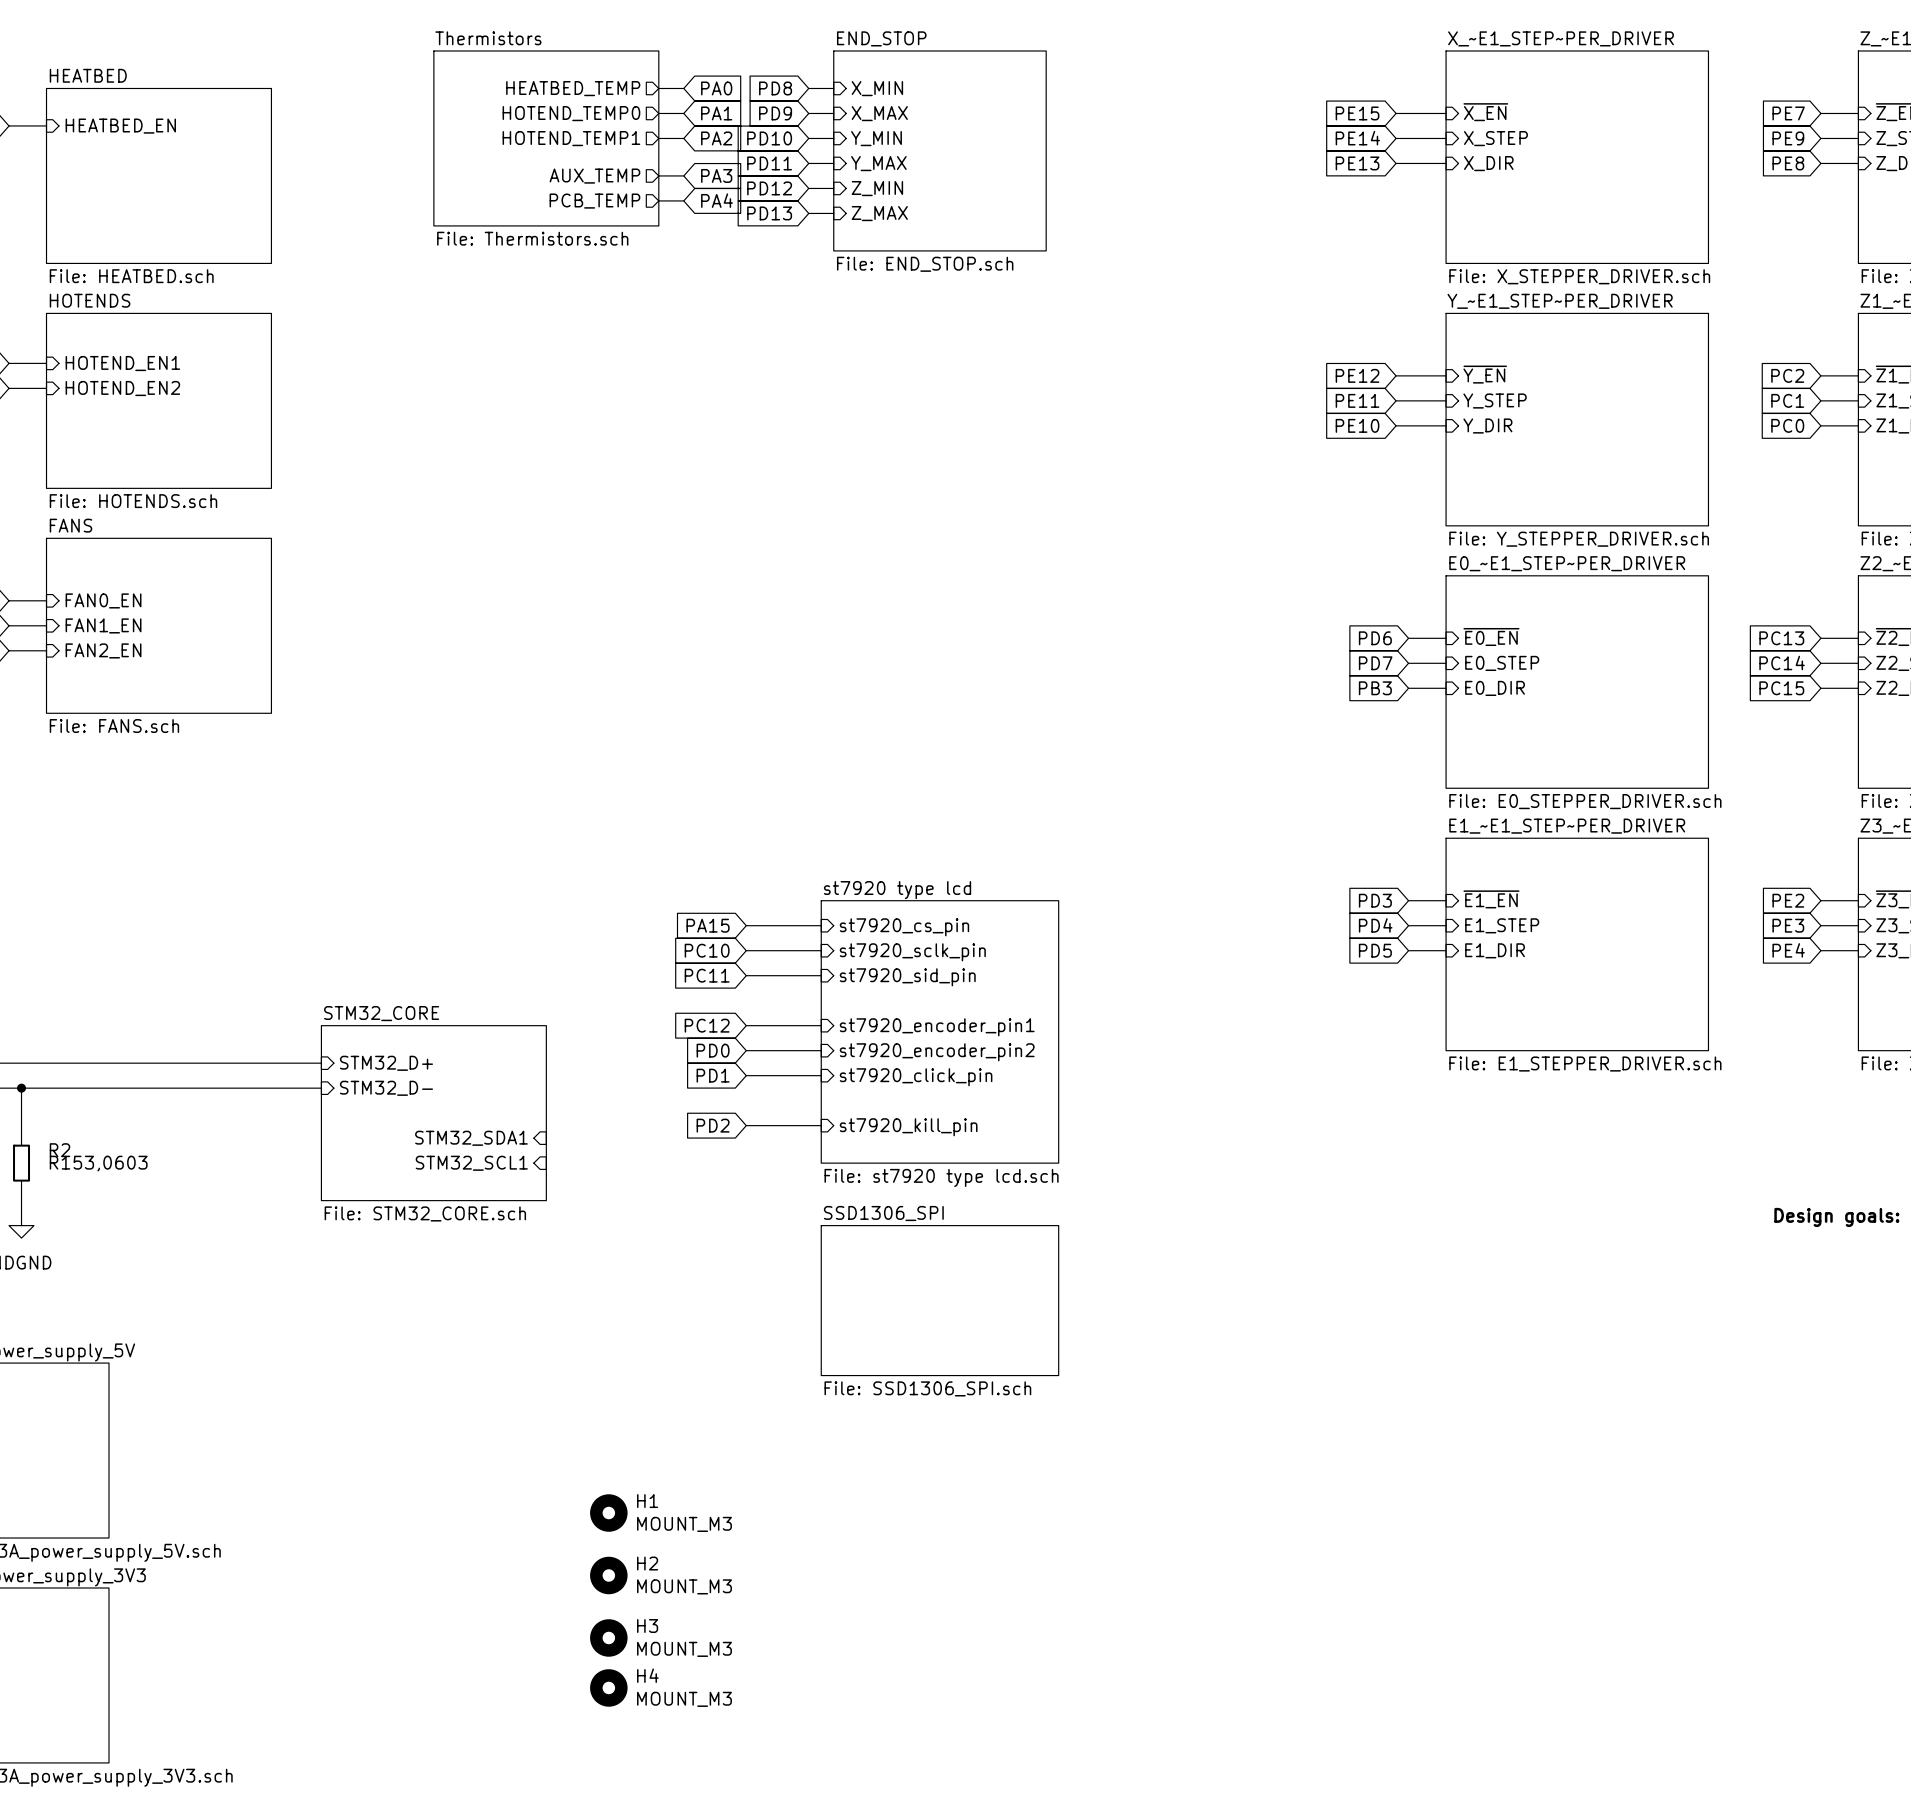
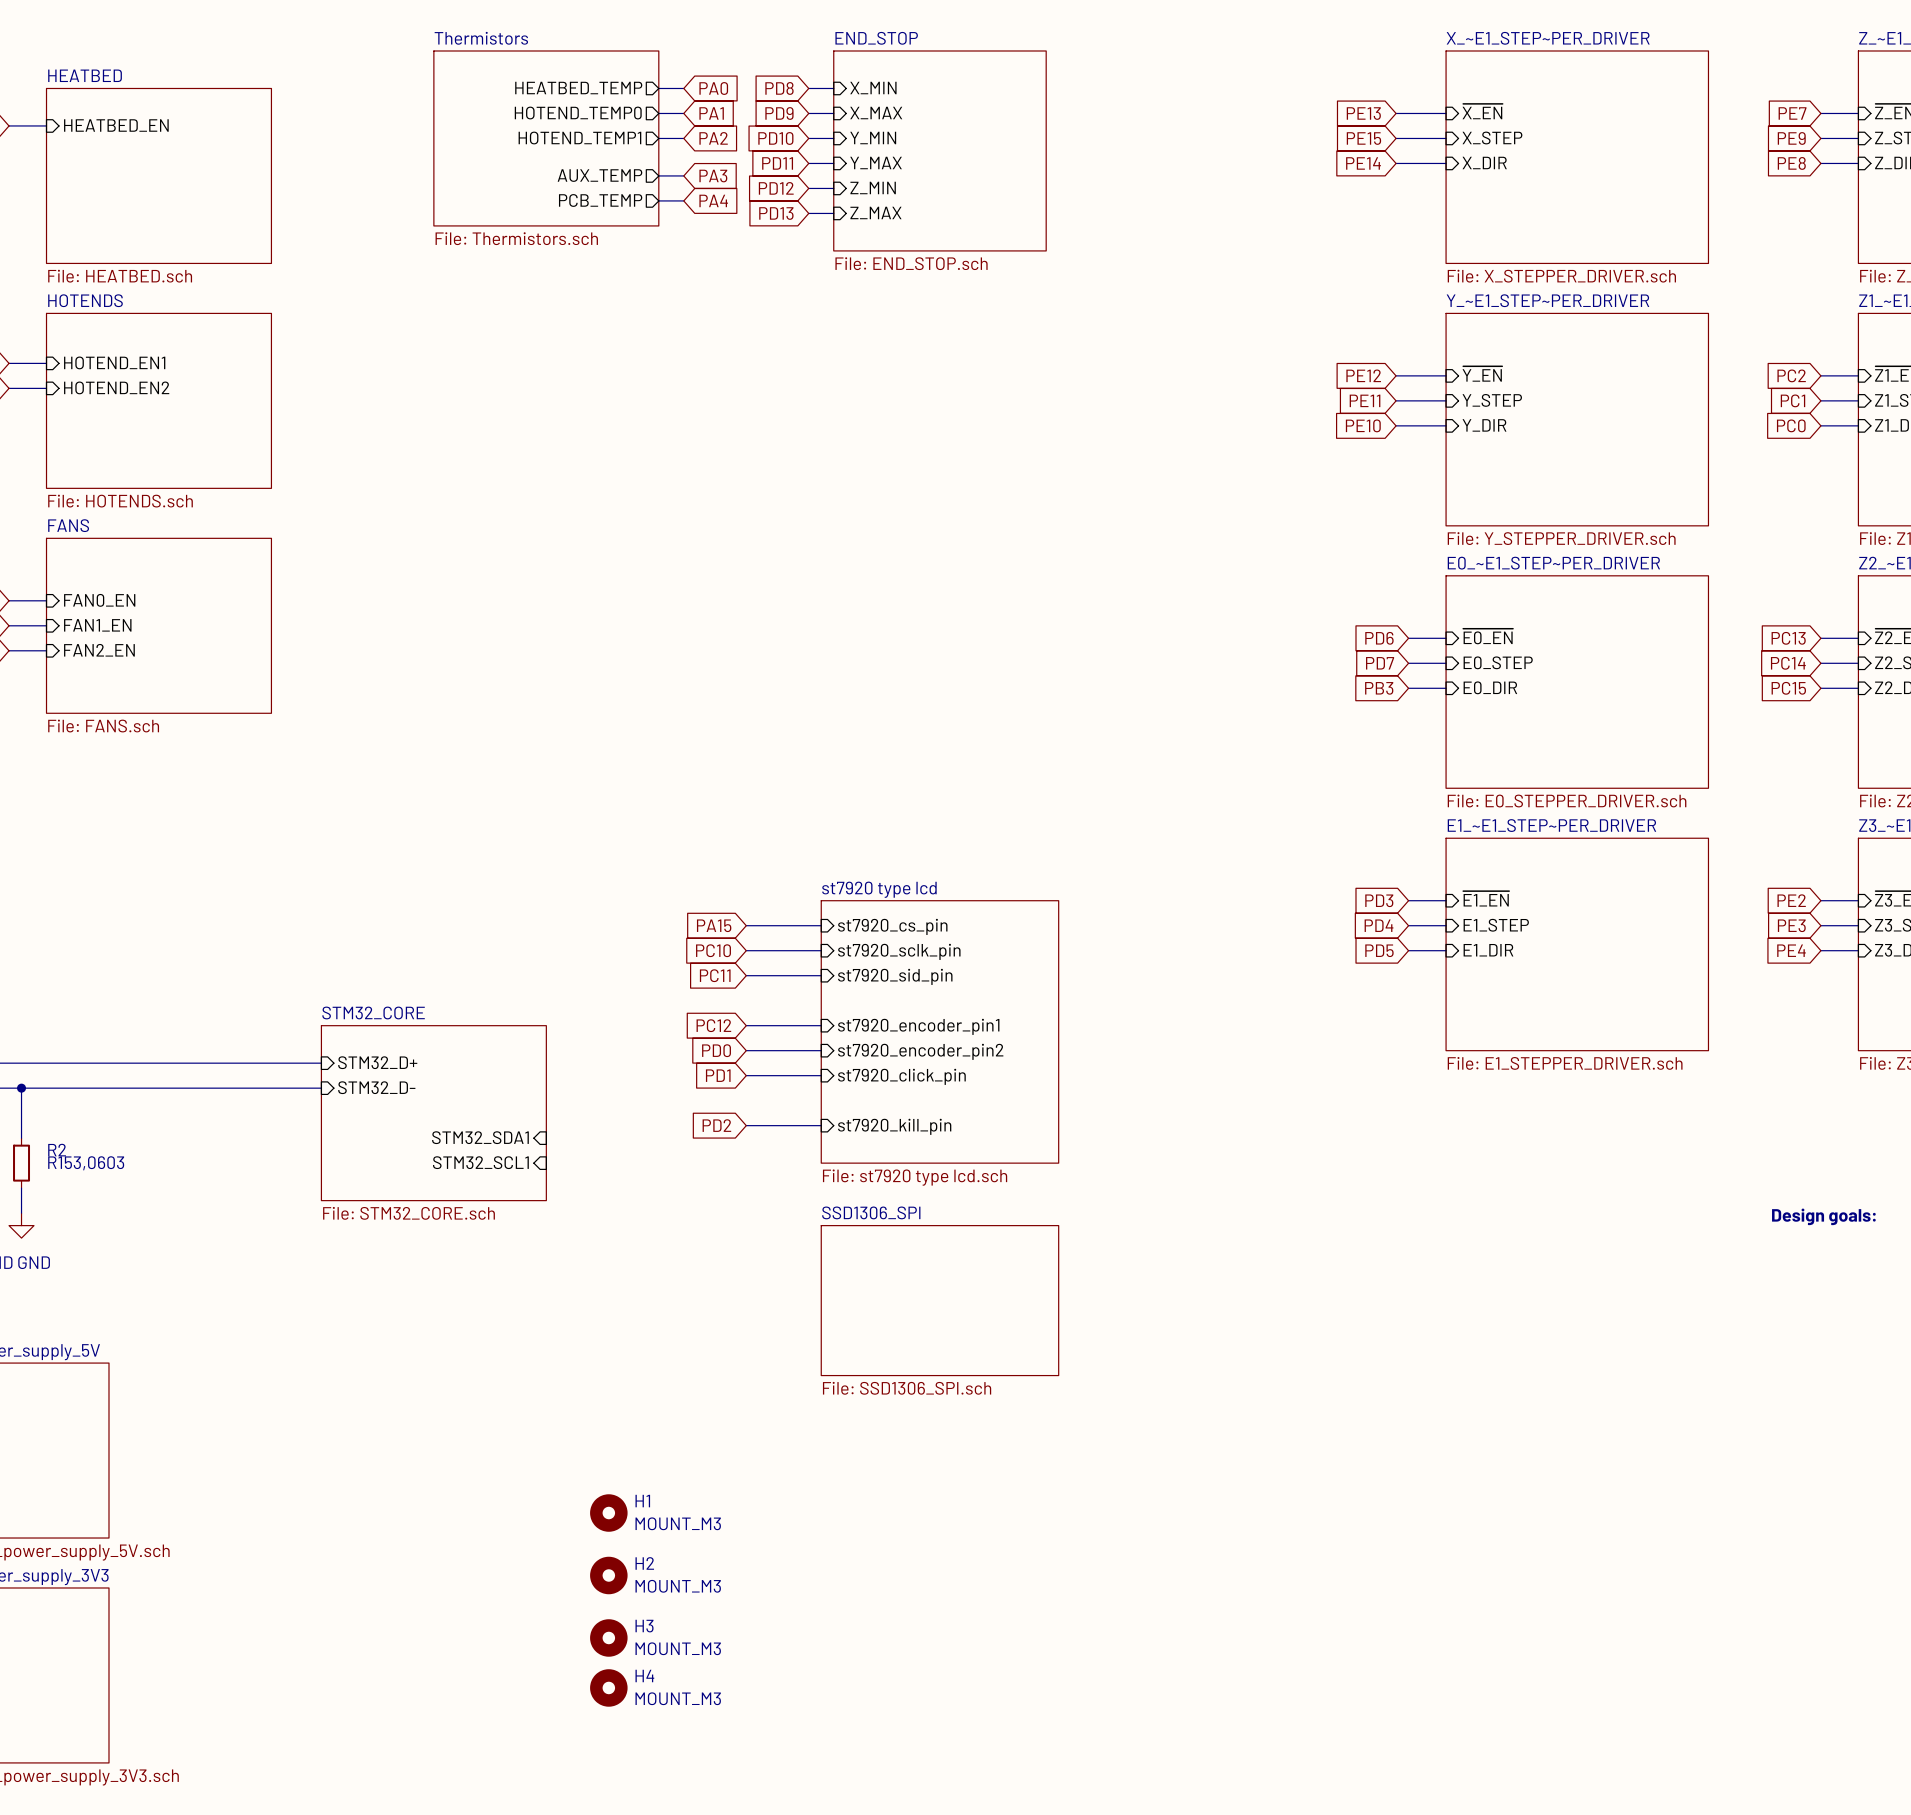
global label: PE15 (1357, 113) -> PE13 (1363, 113)
global label: PE14 (1357, 138) -> PE15 (1363, 138)
global label: PE13 (1357, 163) -> PE14 (1363, 163)

